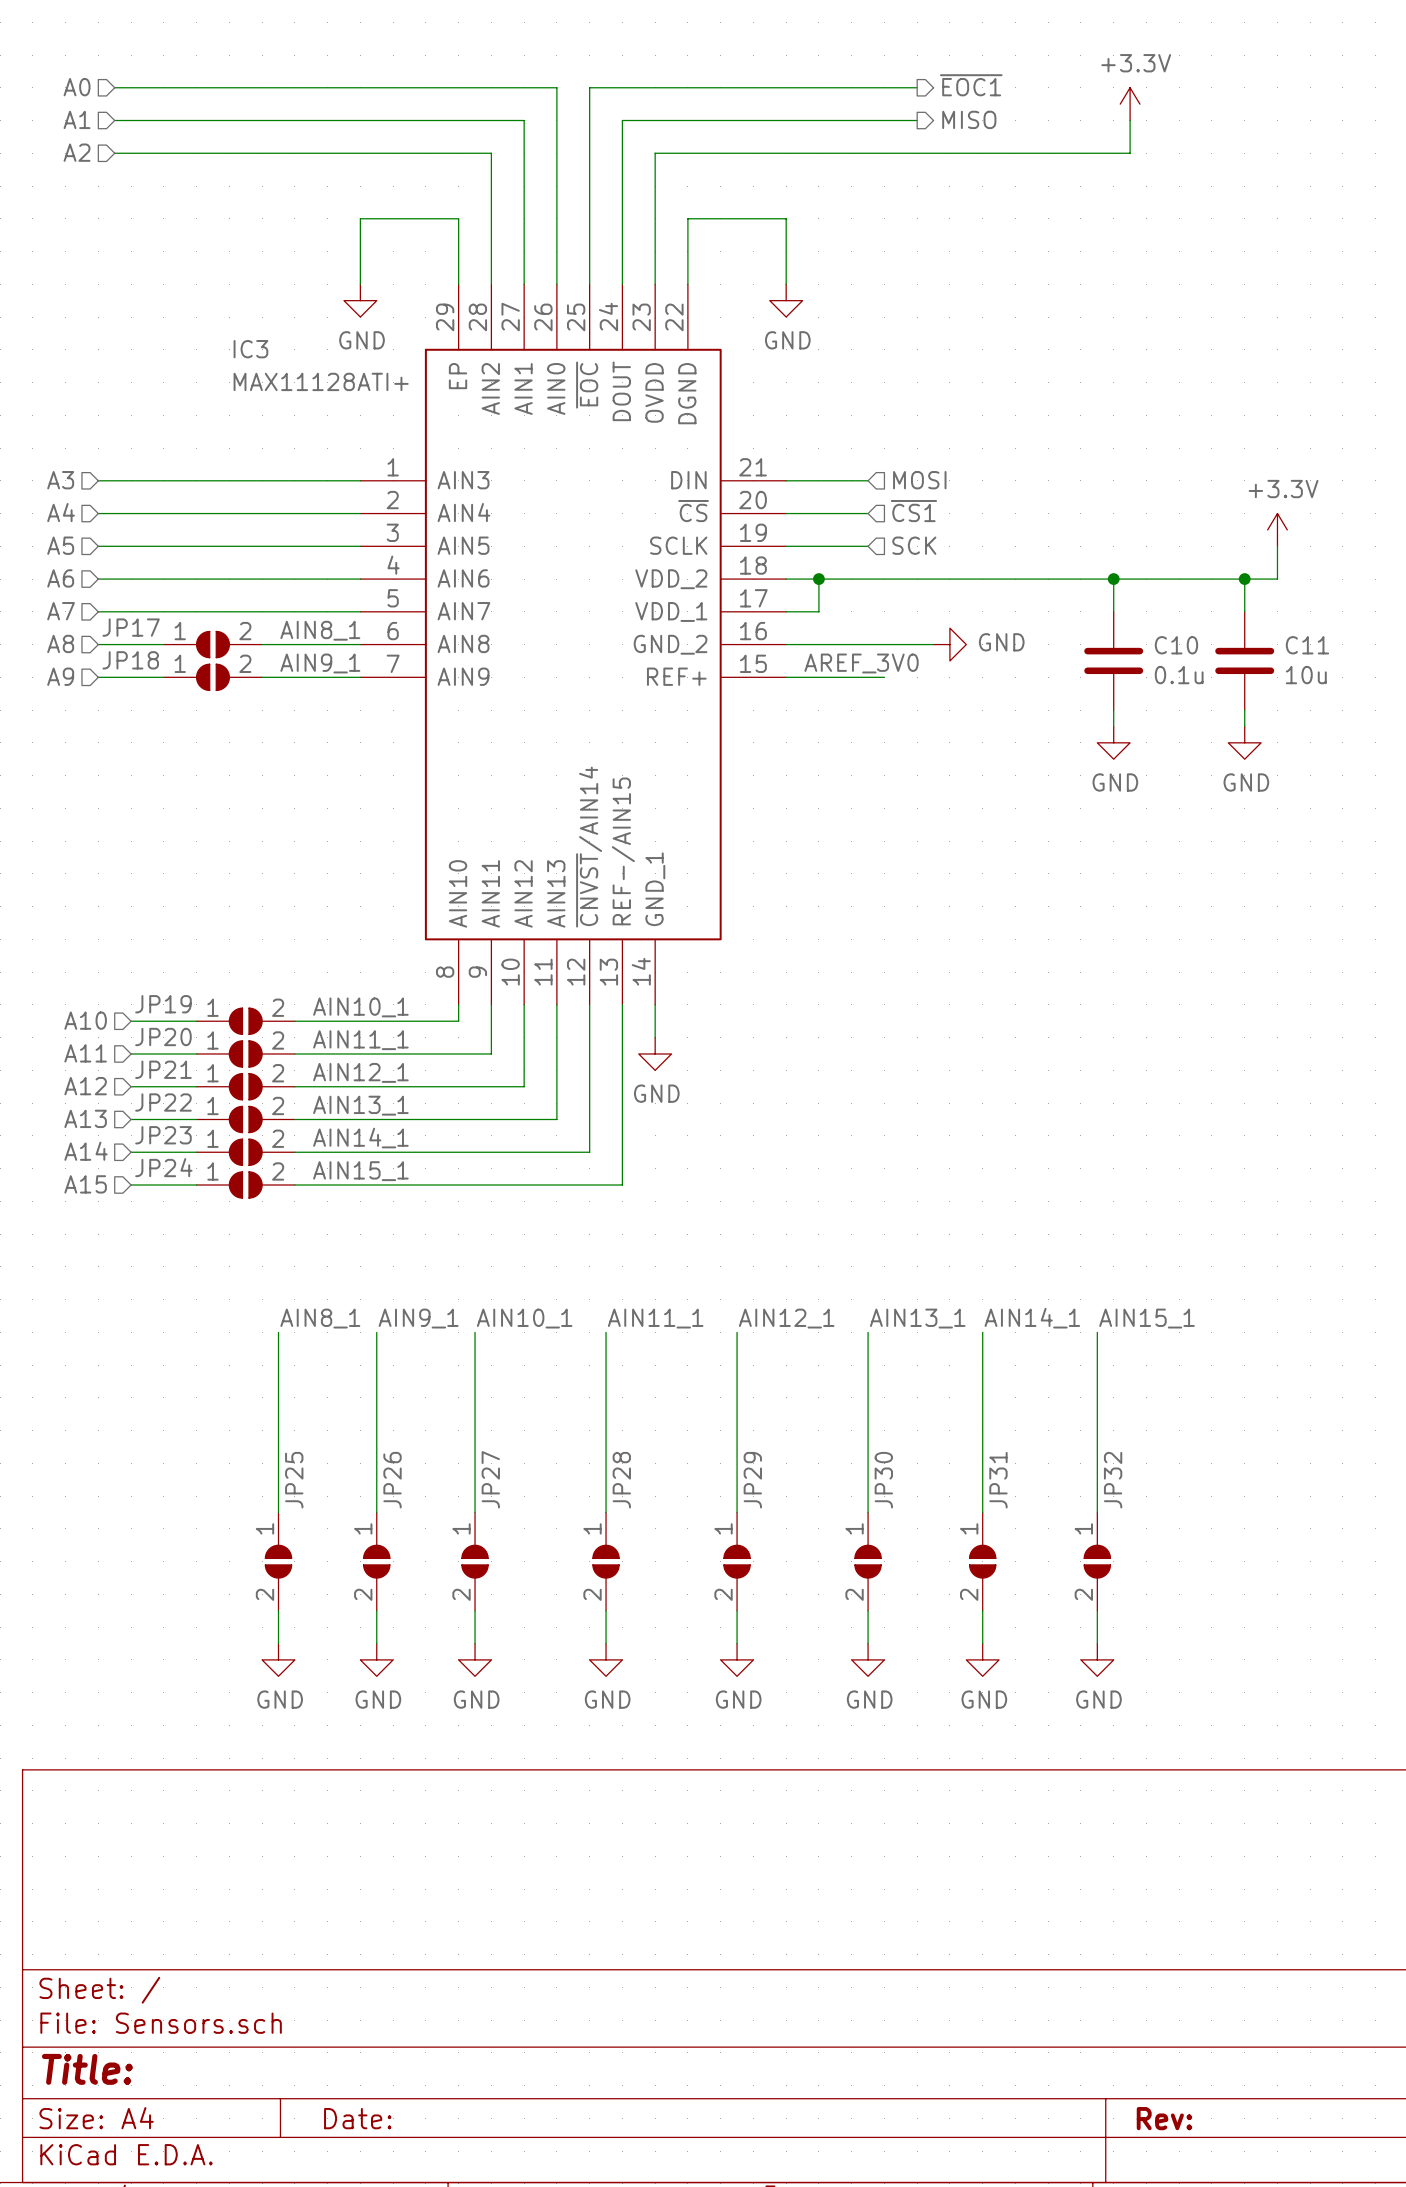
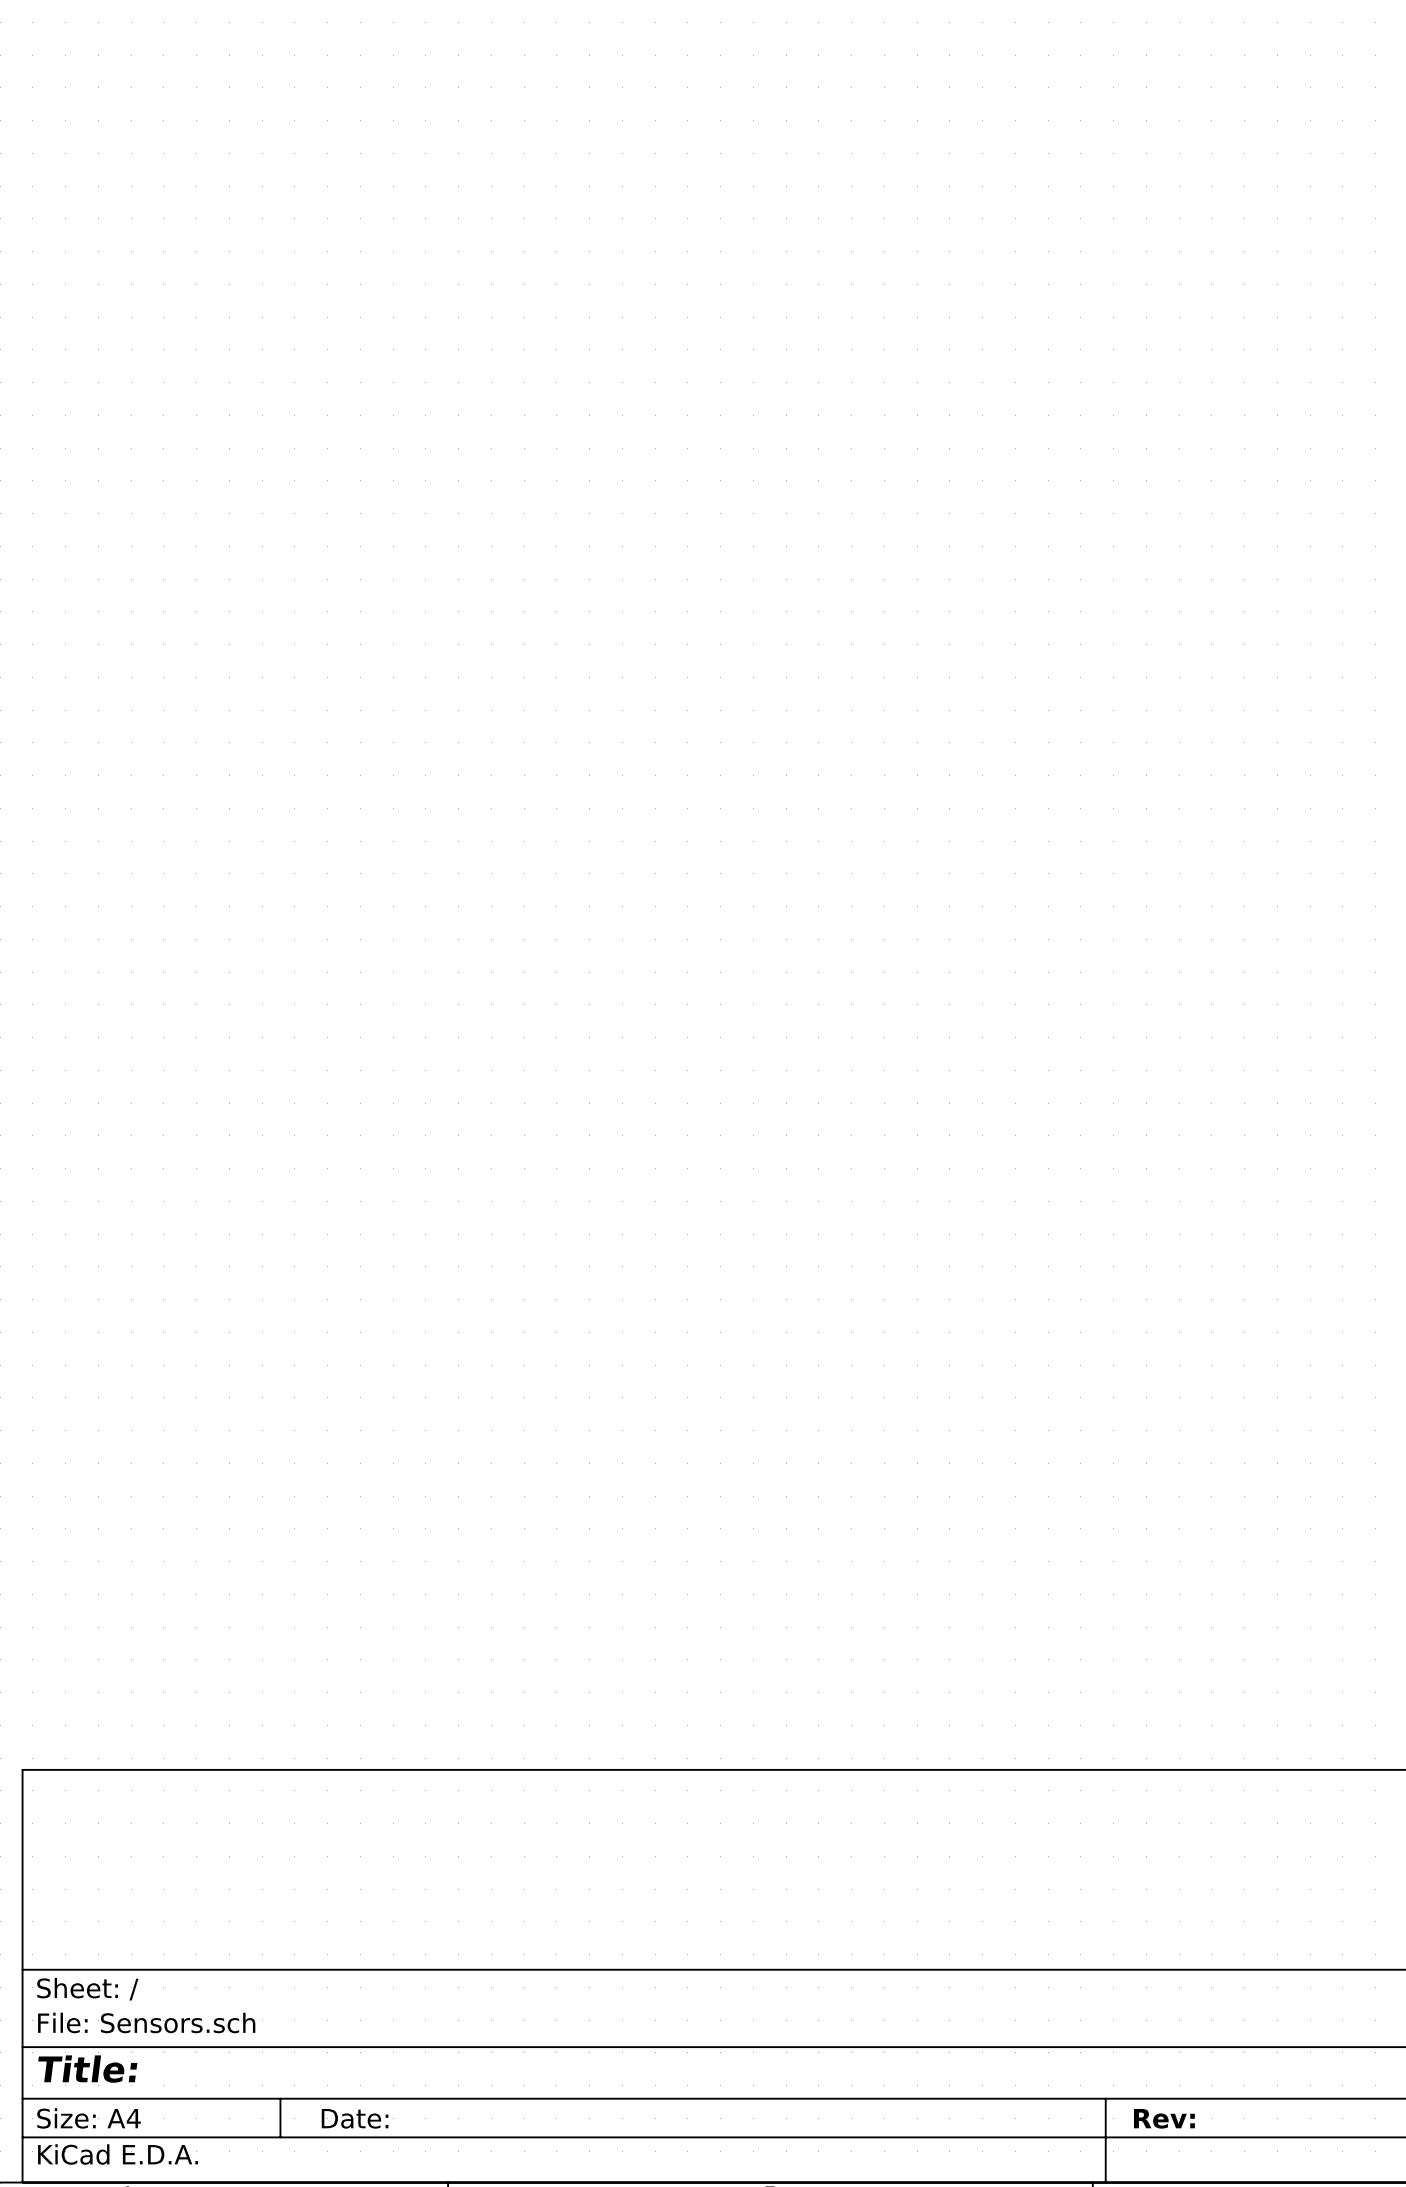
hierarchical label: ~{EOC1} (971, 85) -> none
hierarchical label: A0 (77, 87) -> none
wire: (114, 87) (556, 87) (556, 284) -> none
wire: (917, 87) (589, 87) (589, 284) -> none
power symbol: +3.3V (1130, 104) -> none
hierarchical label: A1 (77, 119) -> none
hierarchical label: MISO (969, 119) -> none
wire: (114, 120) (524, 120) (524, 284) -> none
wire: (917, 120) (622, 120) (622, 284) -> none
wire: (1130, 120) (1130, 153) (655, 153) (655, 284) -> none
hierarchical label: A2 (77, 152) -> none
wire: (114, 153) (491, 153) (491, 284) -> none
wire: (360, 284) (360, 218) (458, 218) (458, 284) -> none
wire: (687, 284) (687, 218) (786, 218) (786, 284) -> none
power symbol: GND (360, 300) -> none
power symbol: GND (786, 300) -> none
hierarchical label: A3 (60, 480) -> none
wire: (98, 480) (360, 480) -> none
wire: (786, 480) (868, 480) -> none
hierarchical label: MOSI (919, 480) -> none
hierarchical label: ~{CS1} (913, 511) -> none
hierarchical label: A4 (61, 512) -> none
wire: (98, 513) (360, 513) -> none
wire: (786, 513) (868, 513) -> none
power symbol: +3.3V (1277, 529) -> none
hierarchical label: A5 (60, 545) -> none
hierarchical label: SCK (914, 545) -> none
wire: (98, 546) (360, 546) -> none
wire: (786, 546) (868, 546) -> none
wire: (1277, 546) (1277, 579) (786, 579) -> none
hierarchical label: A6 (60, 578) -> none
wire: (98, 579) (360, 579) -> none
wire: (818, 579) (818, 611) (786, 611) -> none
junction: (818, 579) -> none
wire: (1113, 579) (1113, 611) -> none
junction: (1113, 579) -> none
wire: (1244, 579) (1244, 611) -> none
junction: (1244, 579) -> none
hierarchical label: A7 (61, 611) -> none
wire: (98, 611) (360, 611) -> none
label: AIN8_1 (320, 630) -> none
hierarchical label: A8 (60, 643) -> none
wire: (98, 644) (163, 644) -> none
JP17: (212, 644) -> none
wire: (262, 644) (360, 644) -> none
IC3: MAX11128ATI+ (573, 644) -> none
wire: (786, 644) (933, 644) -> none
power symbol: GND (949, 644) -> none
C10: 0.1u (1113, 660) -> none
C11: 10u (1244, 660) -> none
label: AIN9_1 (320, 663) -> none
label: AREF_3V0 (861, 663) -> none
hierarchical label: A9 (60, 676) -> none
wire: (98, 677) (163, 677) -> none
JP18: (212, 677) -> none
wire: (262, 677) (360, 677) -> none
wire: (786, 677) (884, 677) -> none
wire: (1113, 710) (1113, 726) -> none
wire: (1244, 710) (1244, 726) -> none
power symbol: GND (1113, 742) -> none
power symbol: GND (1244, 742) -> none
wire: (458, 1004) (458, 1021) (294, 1021) -> none
wire: (491, 1004) (491, 1053) (294, 1053) -> none
wire: (524, 1004) (524, 1086) (294, 1086) -> none
wire: (556, 1004) (556, 1119) (294, 1119) -> none
wire: (589, 1004) (589, 1152) (294, 1152) -> none
wire: (622, 1004) (622, 1185) (294, 1185) -> none
wire: (655, 1004) (655, 1037) -> none
label: AIN10_1 (360, 1007) -> none
hierarchical label: A10 (85, 1020) -> none
wire: (131, 1021) (196, 1021) -> none
JP19: (245, 1021) -> none
label: AIN11_1 (360, 1040) -> none
hierarchical label: A11 (85, 1053) -> none
wire: (131, 1053) (196, 1053) -> none
JP20: (245, 1053) -> none
power symbol: GND (655, 1053) -> none
label: AIN12_1 (360, 1072) -> none
hierarchical label: A12 (85, 1086) -> none
wire: (131, 1086) (196, 1086) -> none
JP21: (245, 1086) -> none
label: AIN13_1 (360, 1105) -> none
hierarchical label: A13 (85, 1118) -> none
wire: (131, 1119) (196, 1119) -> none
JP22: (245, 1119) -> none
label: AIN14_1 (360, 1138) -> none
hierarchical label: A14 (86, 1151) -> none
wire: (131, 1152) (196, 1152) -> none
JP23: (245, 1152) -> none
label: AIN15_1 (360, 1171) -> none
hierarchical label: A15 (85, 1184) -> none
wire: (131, 1185) (196, 1185) -> none
JP24: (245, 1185) -> none
label: AIN8_1 (320, 1318) -> none
label: AIN9_1 (418, 1318) -> none
label: AIN10_1 (524, 1318) -> none
label: AIN11_1 (655, 1318) -> none
label: AIN12_1 (786, 1318) -> none
label: AIN13_1 (917, 1318) -> none
label: AIN14_1 (1032, 1318) -> none
label: AIN15_1 (1146, 1318) -> none
wire: (278, 1332) (278, 1512) -> none
wire: (376, 1332) (376, 1512) -> none
wire: (475, 1332) (475, 1512) -> none
wire: (606, 1332) (606, 1512) -> none
wire: (737, 1332) (737, 1512) -> none
wire: (868, 1332) (868, 1512) -> none
wire: (982, 1332) (982, 1512) -> none
wire: (1097, 1332) (1097, 1512) -> none
JP25: (278, 1561) -> none
JP26: (376, 1561) -> none
JP27: (475, 1561) -> none
JP28: (606, 1561) -> none
JP29: (737, 1561) -> none
JP30: (868, 1561) -> none
JP31: (982, 1561) -> none
JP32: (1097, 1561) -> none
wire: (278, 1610) (278, 1643) -> none
wire: (376, 1610) (376, 1643) -> none
wire: (475, 1610) (475, 1643) -> none
wire: (606, 1610) (606, 1643) -> none
wire: (737, 1610) (737, 1643) -> none
wire: (868, 1610) (868, 1643) -> none
wire: (982, 1610) (982, 1643) -> none
wire: (1097, 1610) (1097, 1643) -> none
power symbol: GND (278, 1659) -> none
power symbol: GND (376, 1659) -> none
power symbol: GND (475, 1659) -> none
power symbol: GND (606, 1659) -> none
power symbol: GND (737, 1659) -> none
power symbol: GND (868, 1659) -> none
power symbol: GND (982, 1659) -> none
power symbol: GND (1097, 1659) -> none

